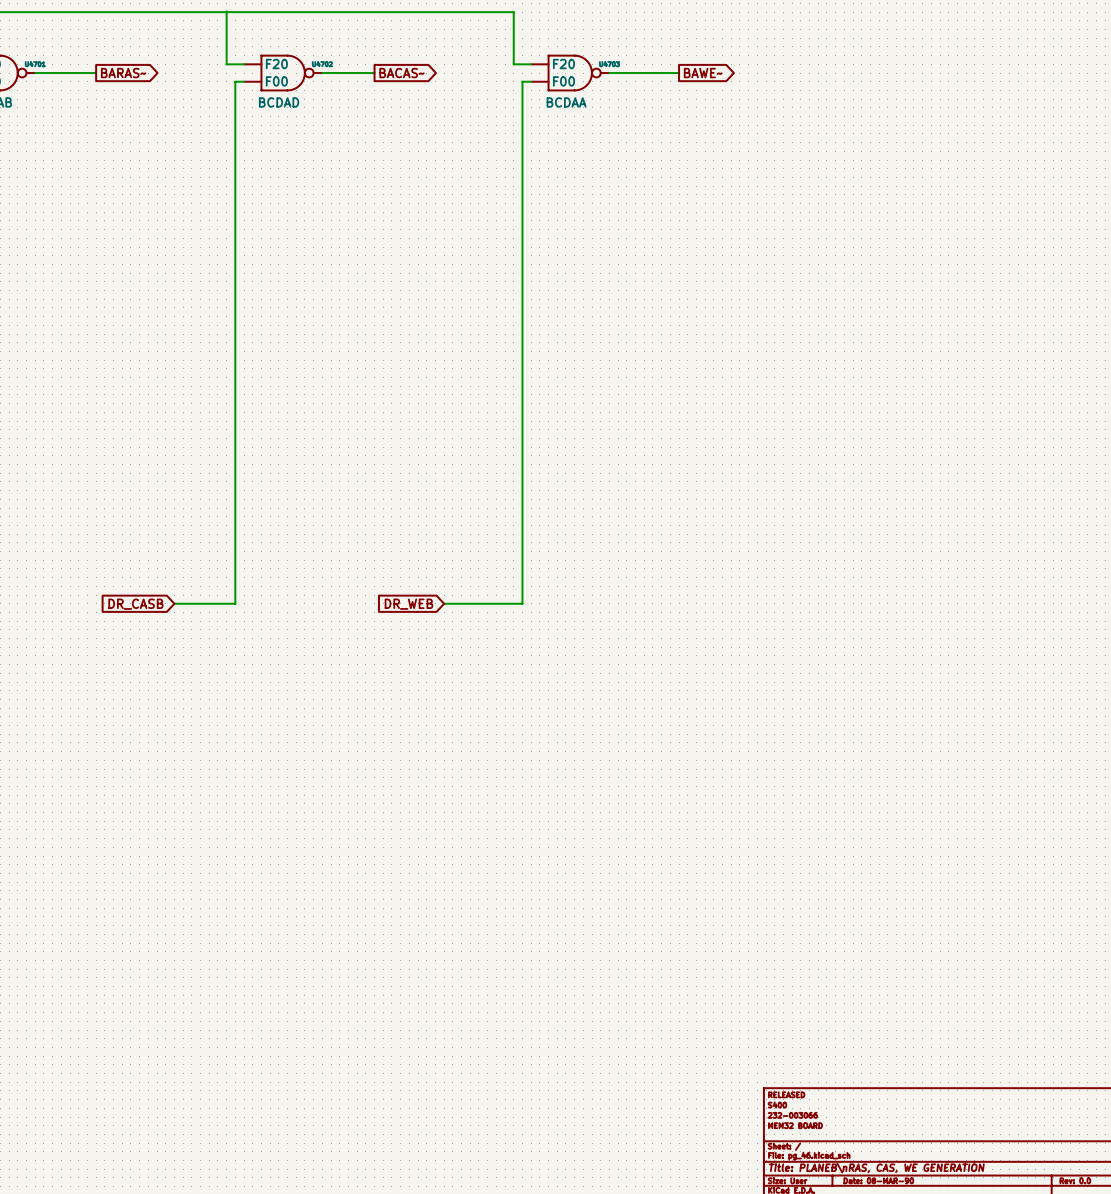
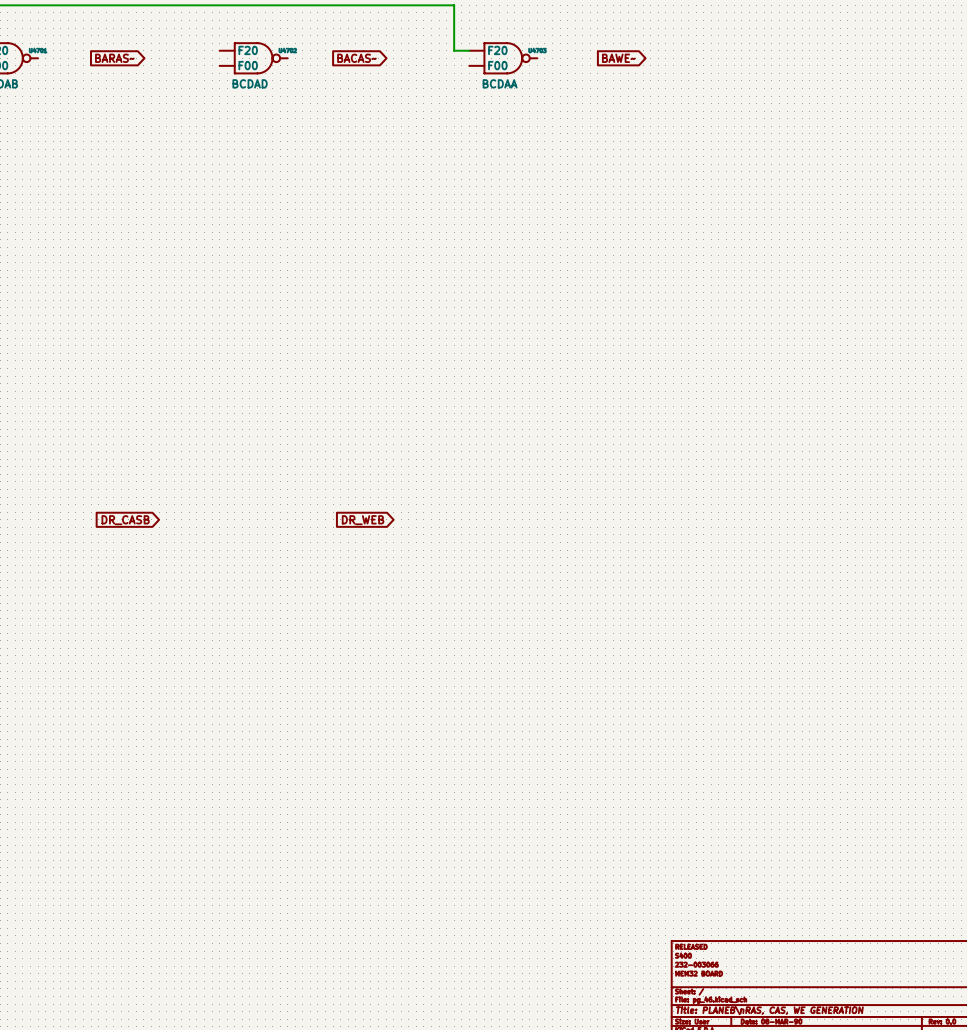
wire: (226, 12) (226, 64) (244, 64) -> none
wire: (35, 73) (96, 73) -> none
wire: (322, 73) (374, 73) -> none
wire: (609, 73) (679, 73) -> none
wire: (244, 81) (235, 81) (235, 603) (174, 603) -> none
wire: (531, 81) (522, 81) (522, 603) (444, 603) -> none

